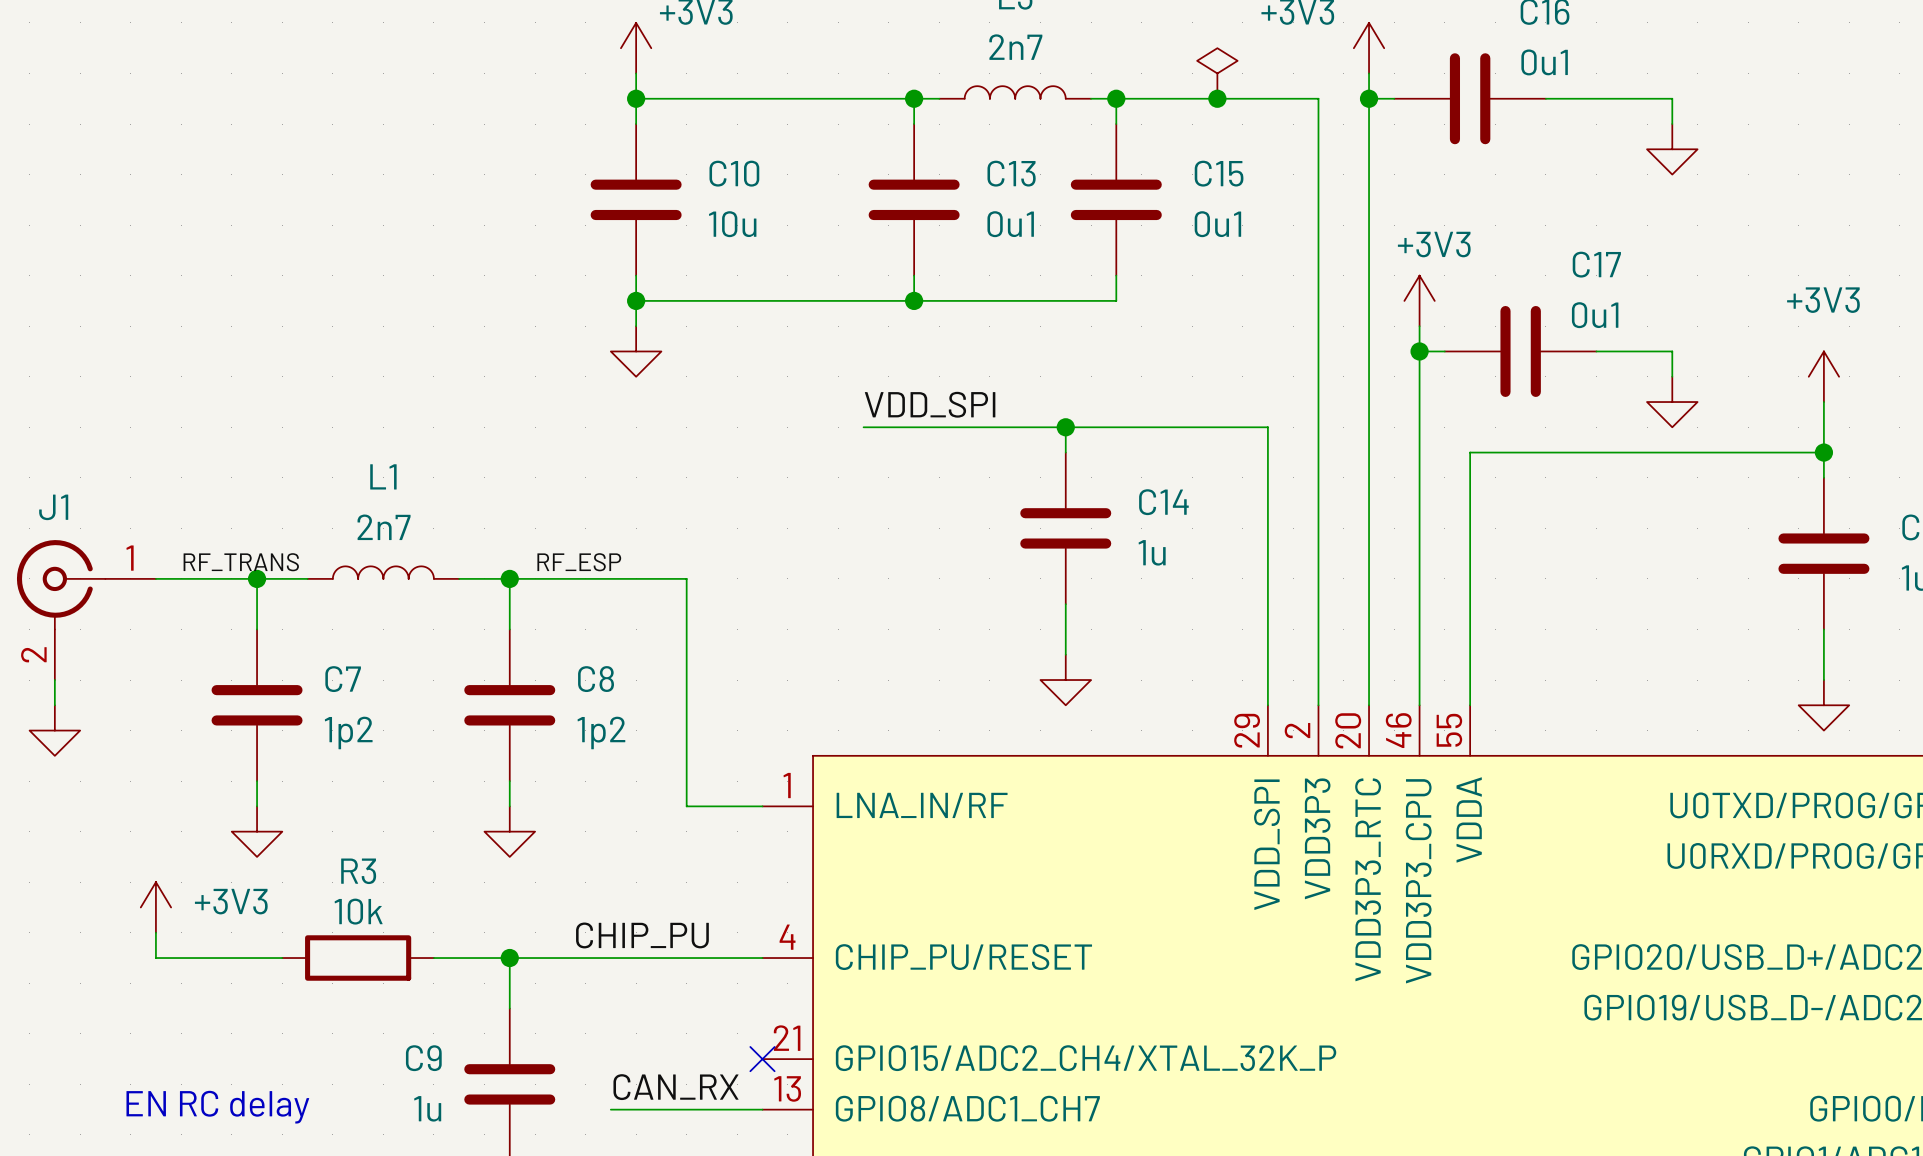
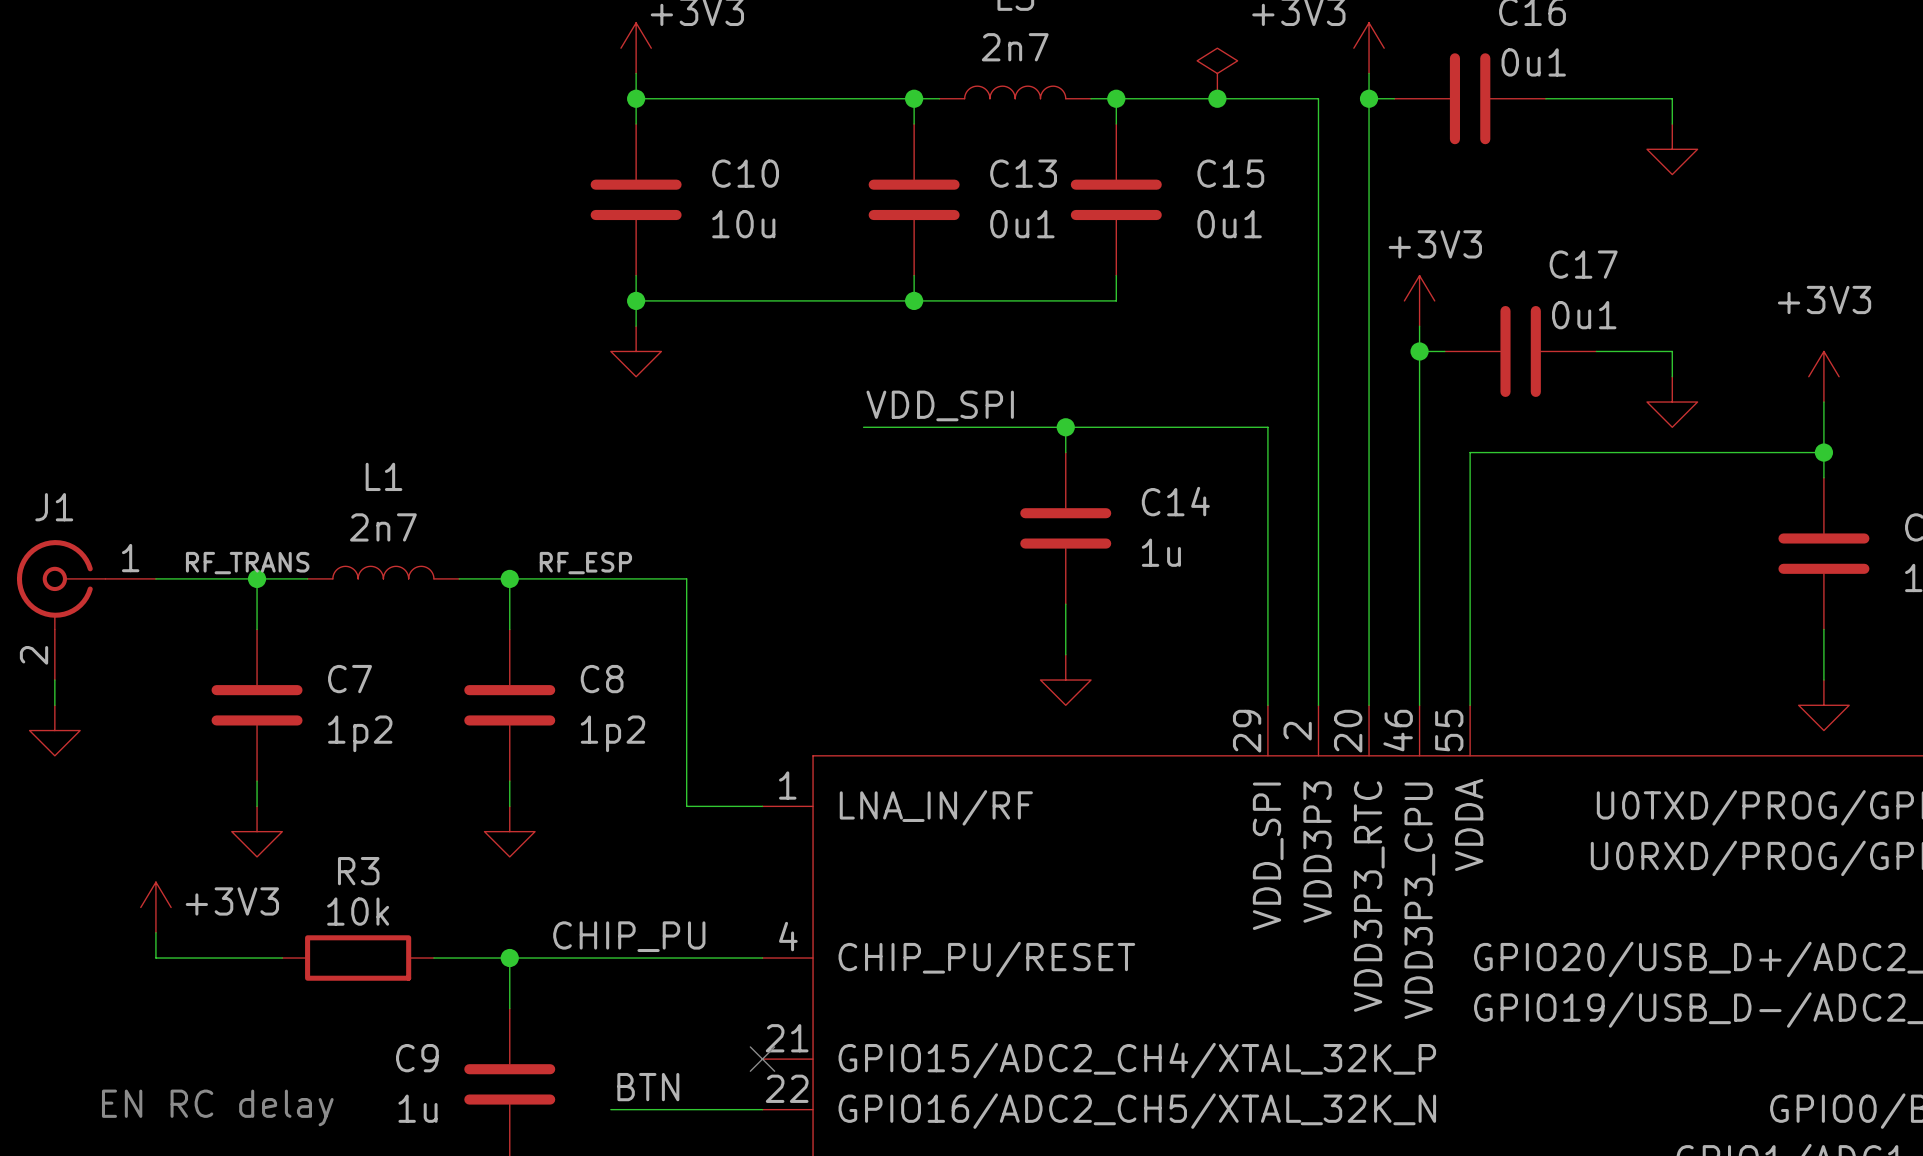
label: CAN_RX (676, 1087) -> BTN (648, 1087)
part pin number: 13 (787, 1088) -> 22 (787, 1088)
part pin name: GPIO8/ADC1_CH7 (967, 1108) -> GPIO16/ADC2_CH5/XTAL_32K_N (1137, 1111)

